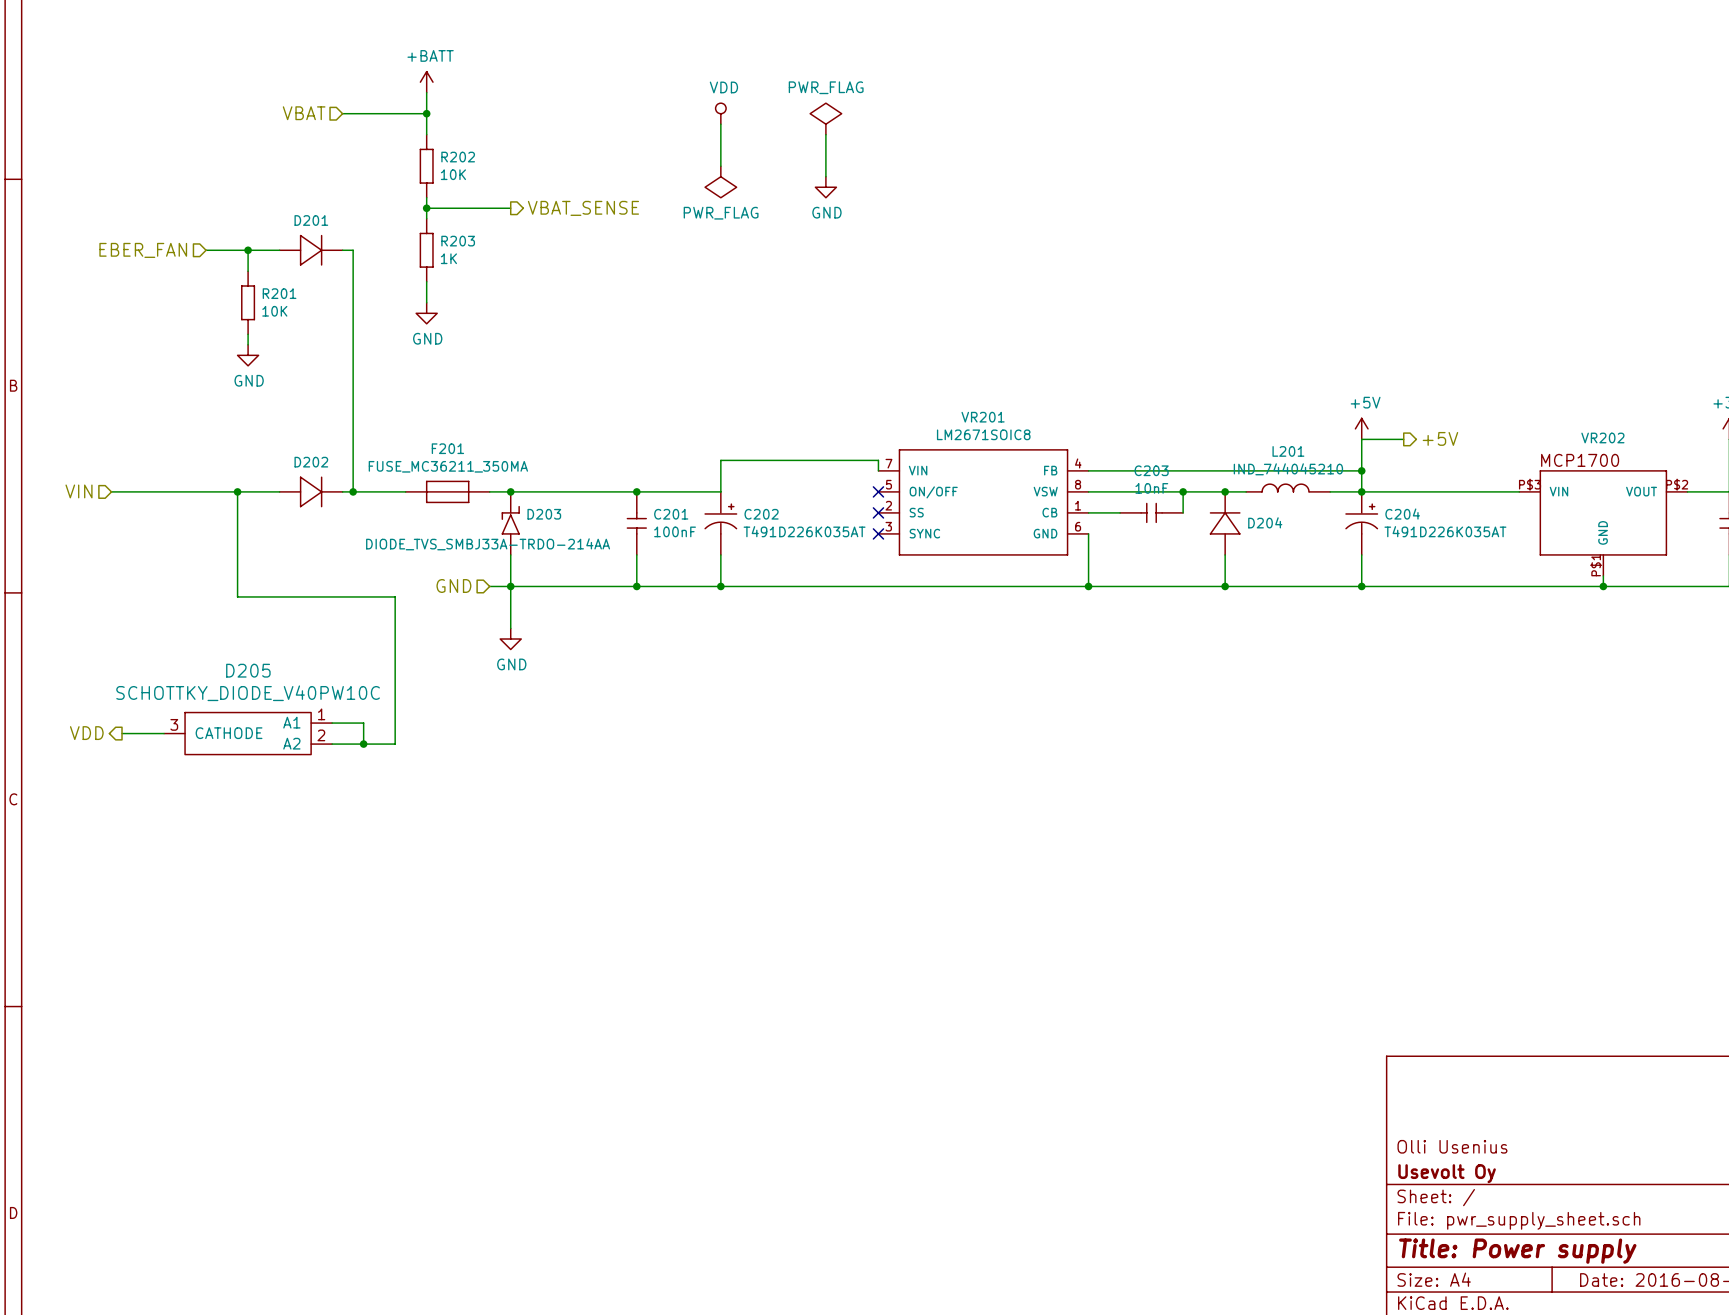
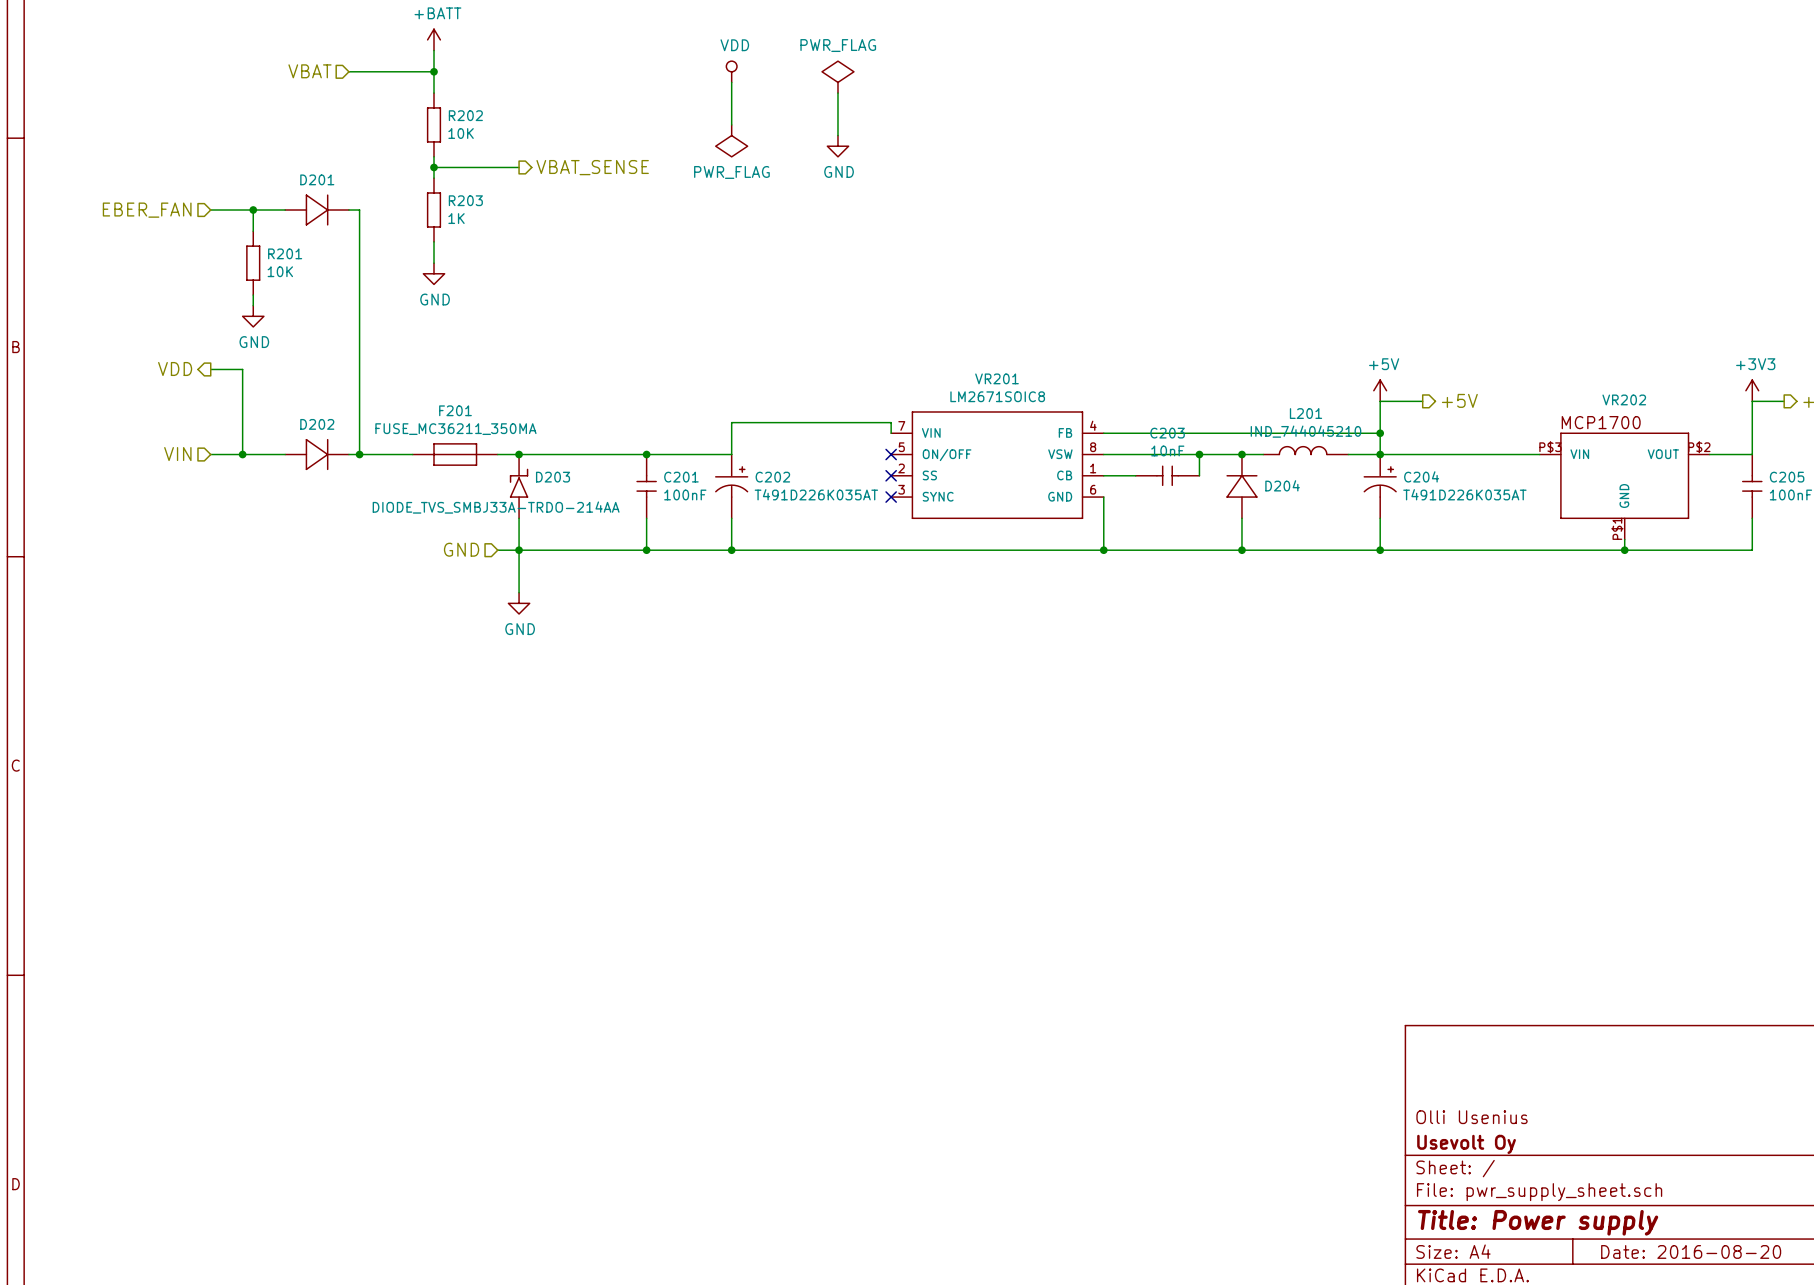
hierarchical label: none -> VDD (175, 368)
hierarchical label position: VIN (79, 491) -> VIN (177, 454)
wire: (111, 491) (206, 491) -> none
wire: (237, 491) (237, 596) (395, 596) (395, 744) (332, 744) -> (242, 454) (242, 369) (210, 369)
wire: (332, 723) (363, 723) (363, 744) -> none
hierarchical label: VDD (86, 733) -> none
wire: (122, 733) (164, 733) -> none
D205: SCHOTTKY_DIODE_V40PW10C (248, 733) -> none
junction: (363, 744) -> none

